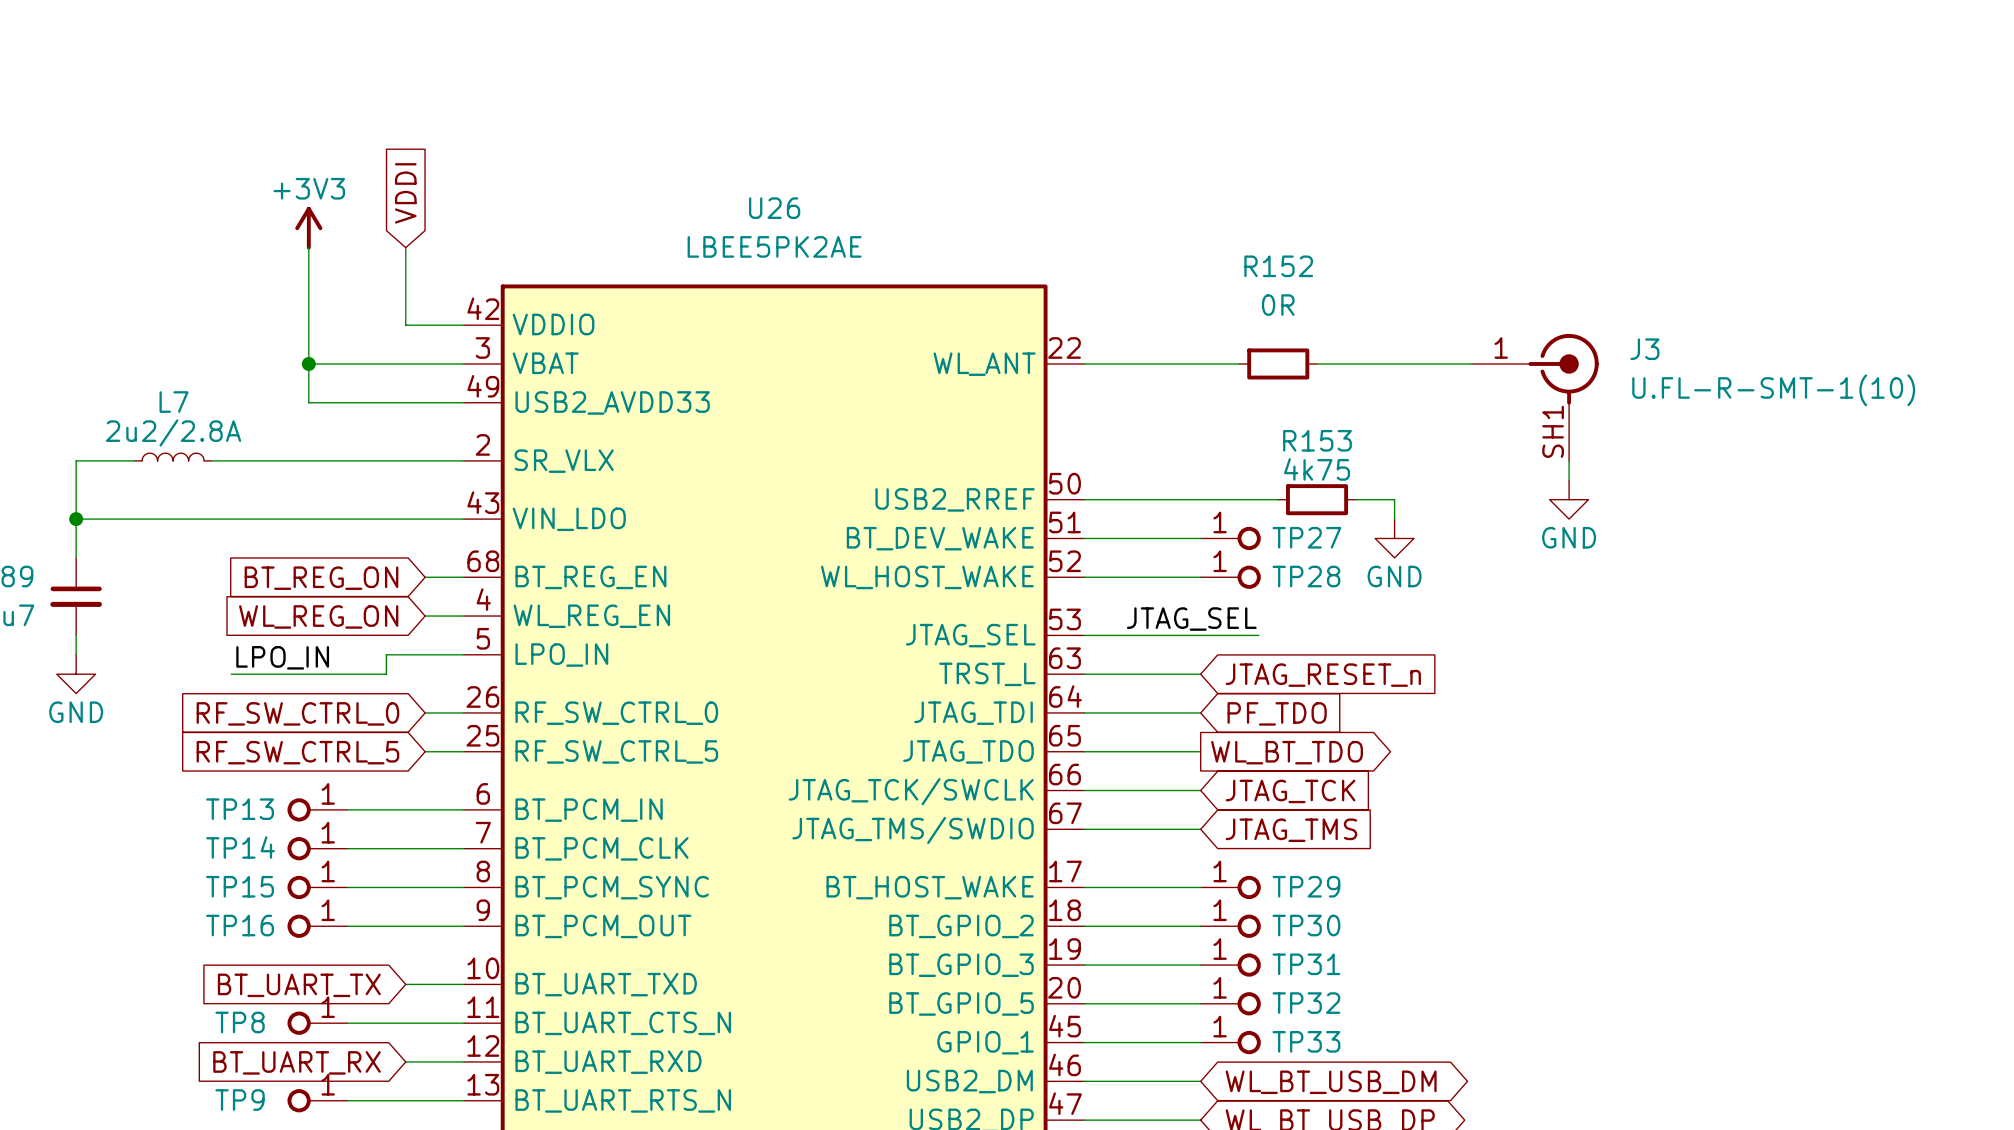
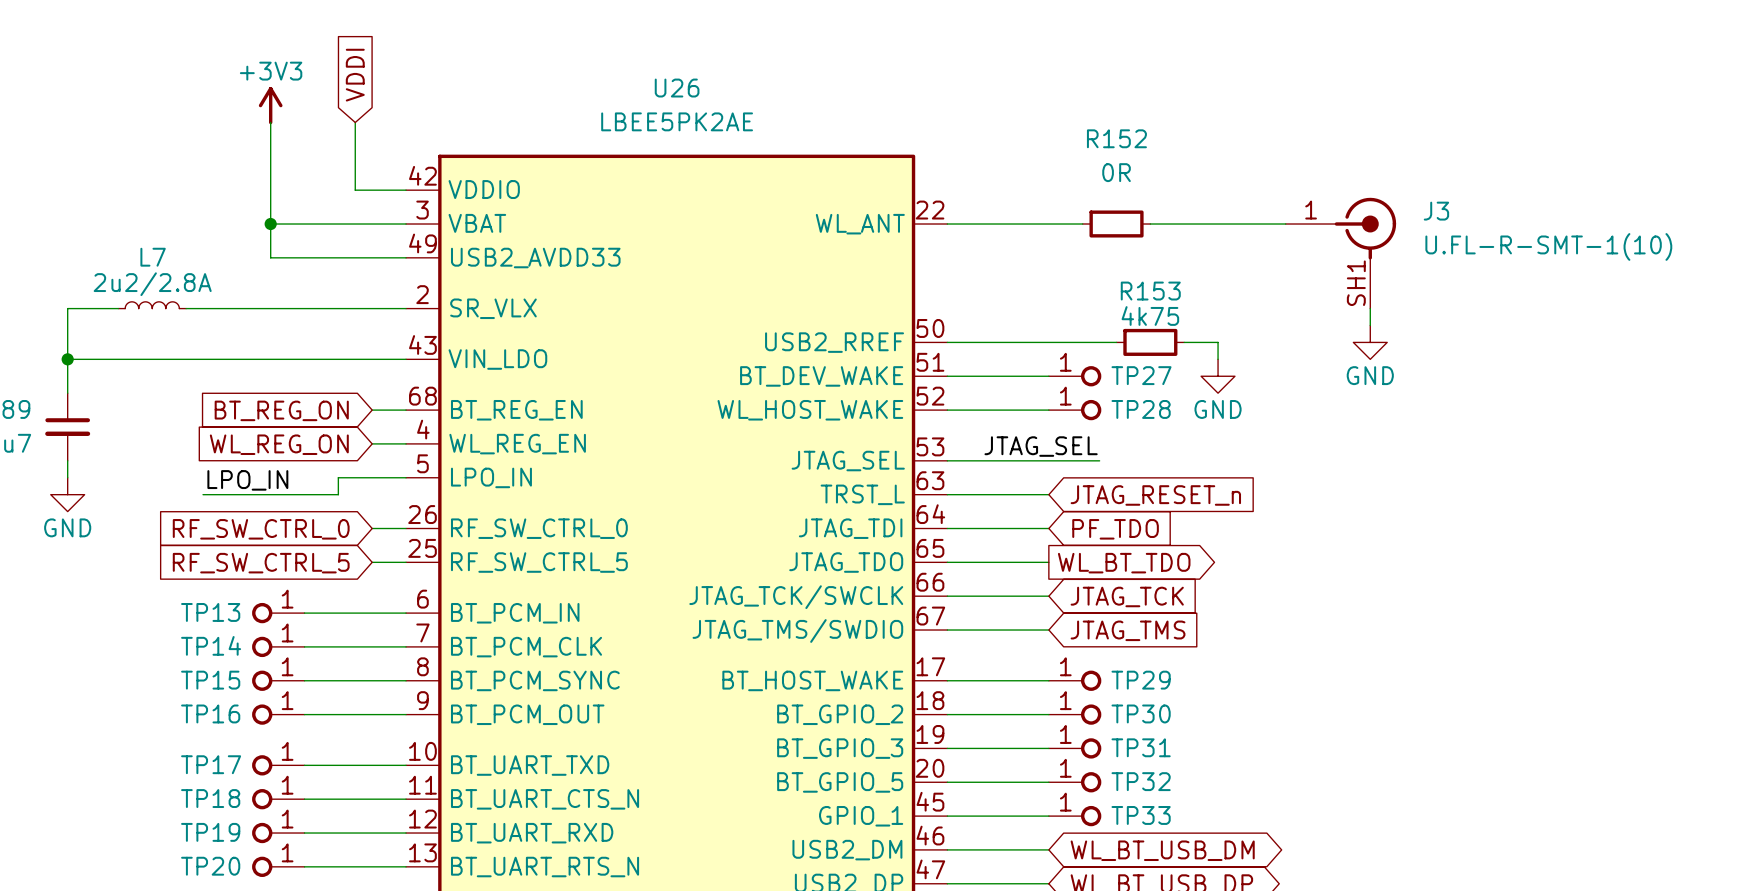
TP17: none -> (278, 765)
wire: none -> (304, 765) (355, 765)
global label: BT_UART_TX (299, 985) -> none
TP8 name: TP8 (240, 1022) -> TP18 (210, 798)
TP19: none -> (278, 833)
wire: none -> (304, 833) (355, 833)
global label: BT_UART_RX (297, 1062) -> none
TP9 name: TP9 (240, 1100) -> TP20 (210, 866)

